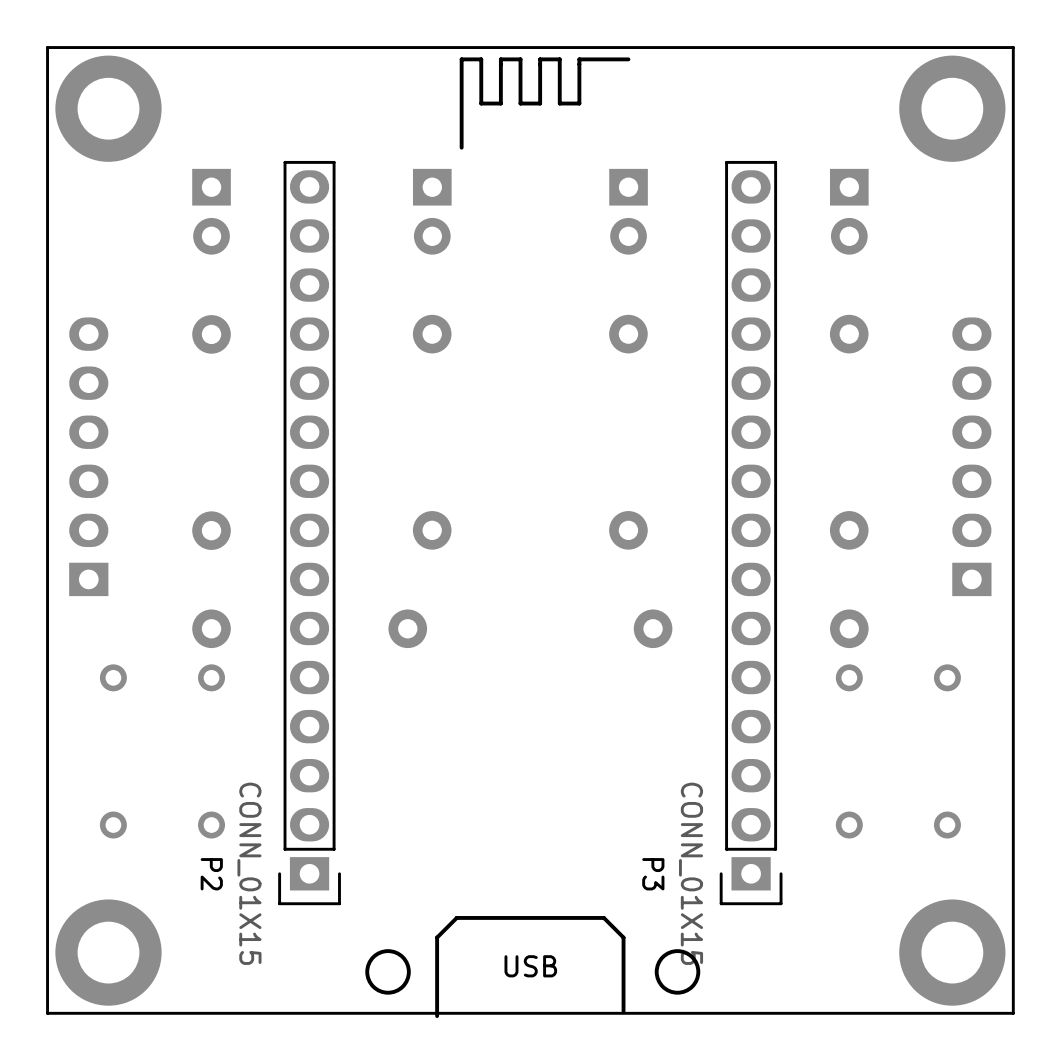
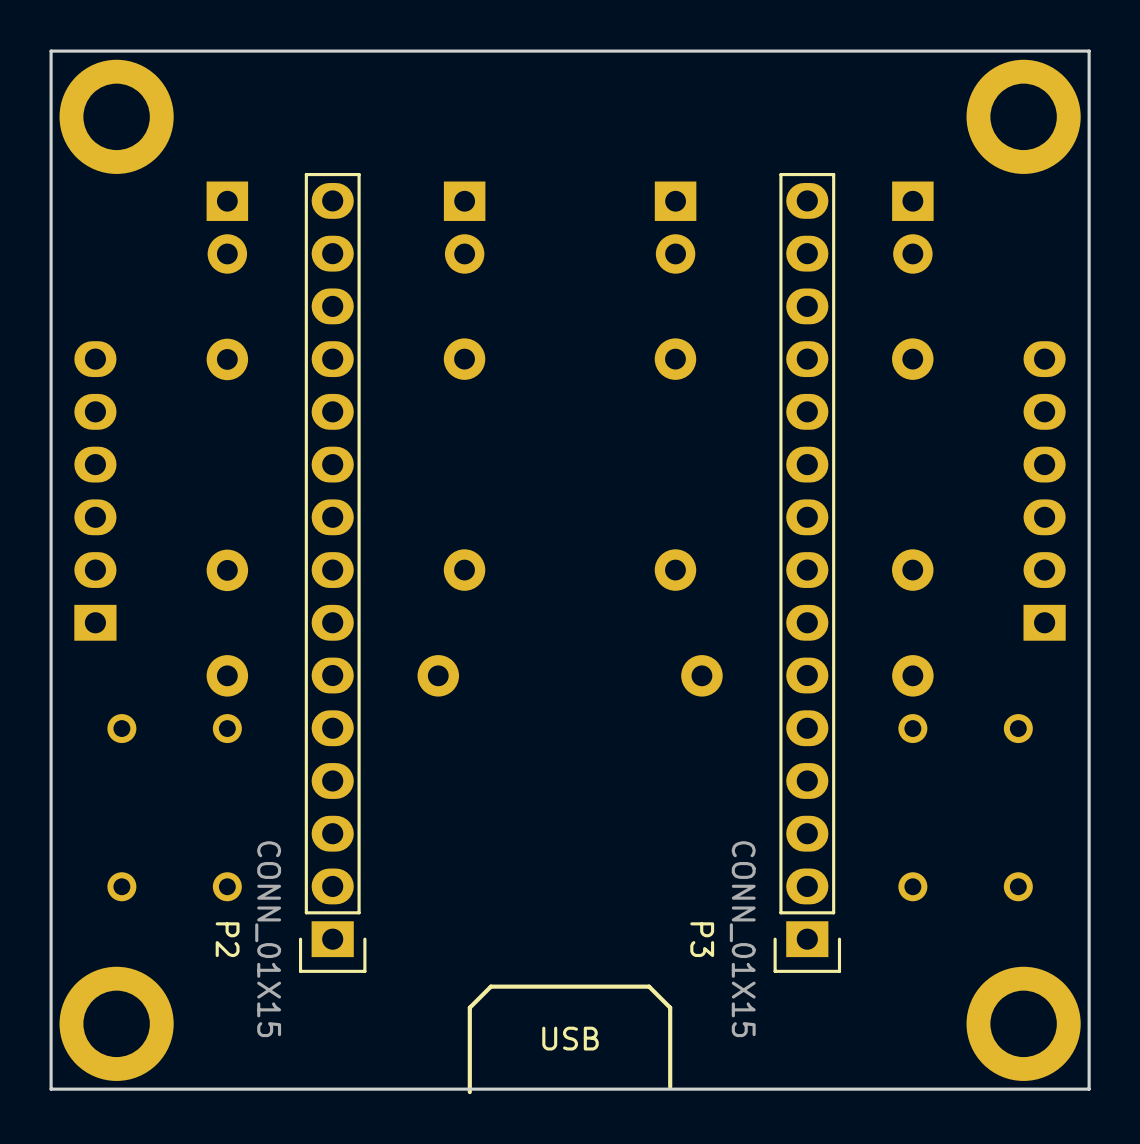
line: (628, 59) (579, 59) (579, 103) (559, 103) (559, 59) (540, 59) (540, 103) (520, 103) (520, 59) (500, 59) (500, 103) (481, 103) (481, 59) (461, 59) (461, 147) -> none
drawing: [365, 949, 411, 995] -> none
drawing: [654, 949, 701, 995] -> none

